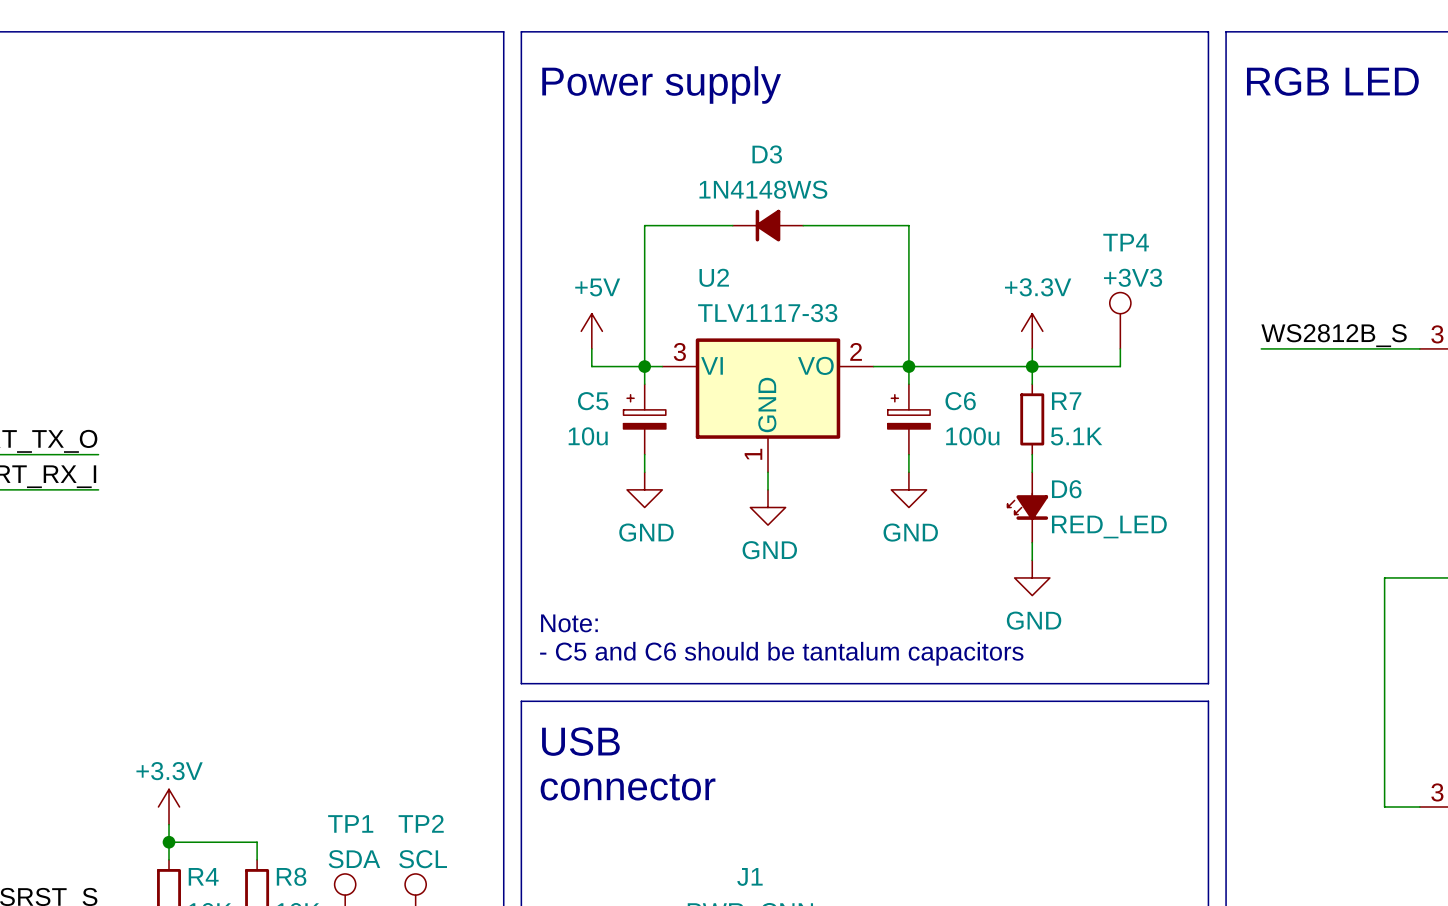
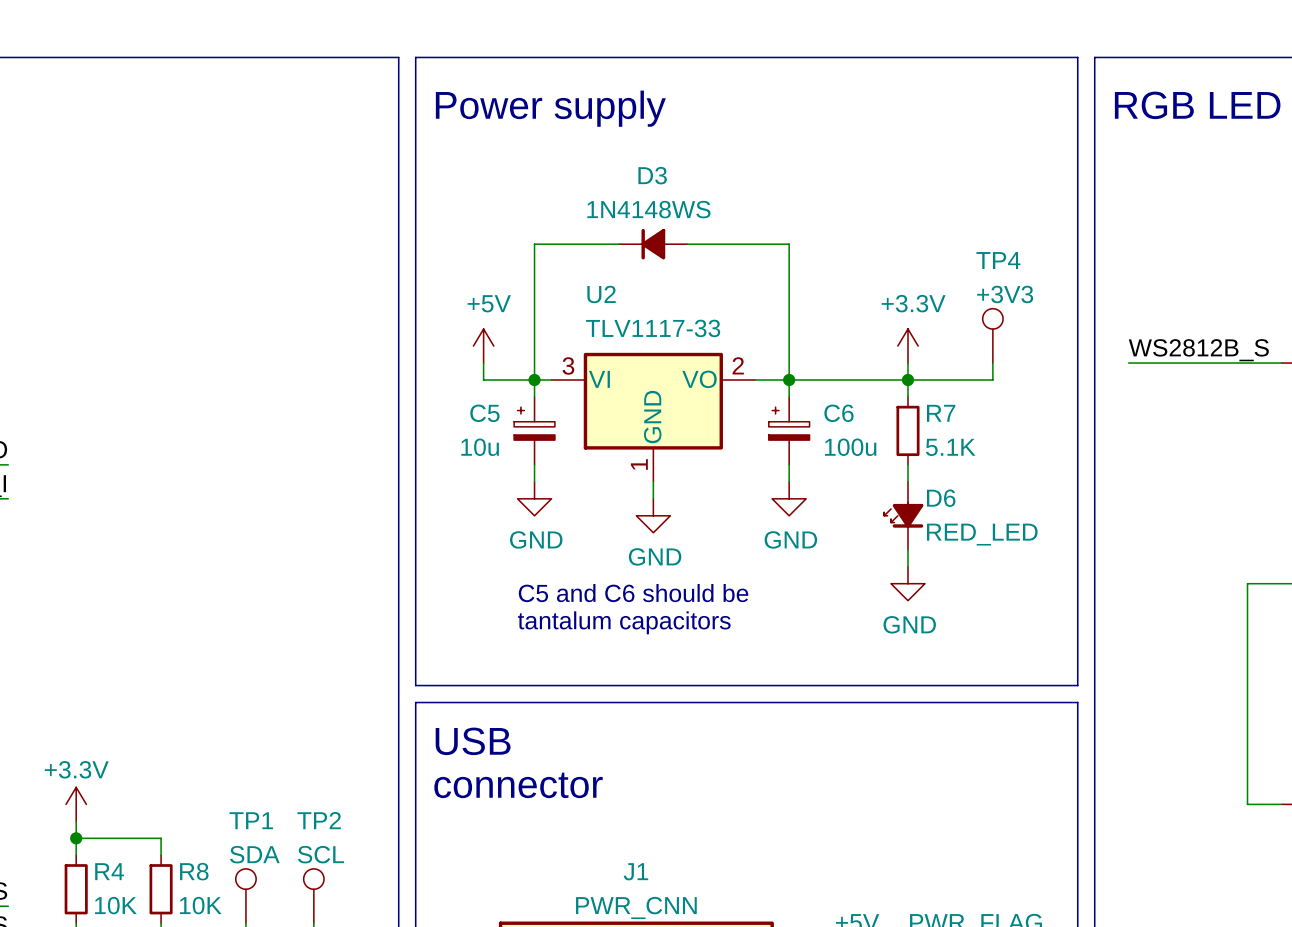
text: none -> C5 and C6 should be (633, 593)
text: Note: (569, 623) -> none
text: - C5 and C6 should be tantalum capacitors (781, 653) -> tantalum capacitors (624, 622)

